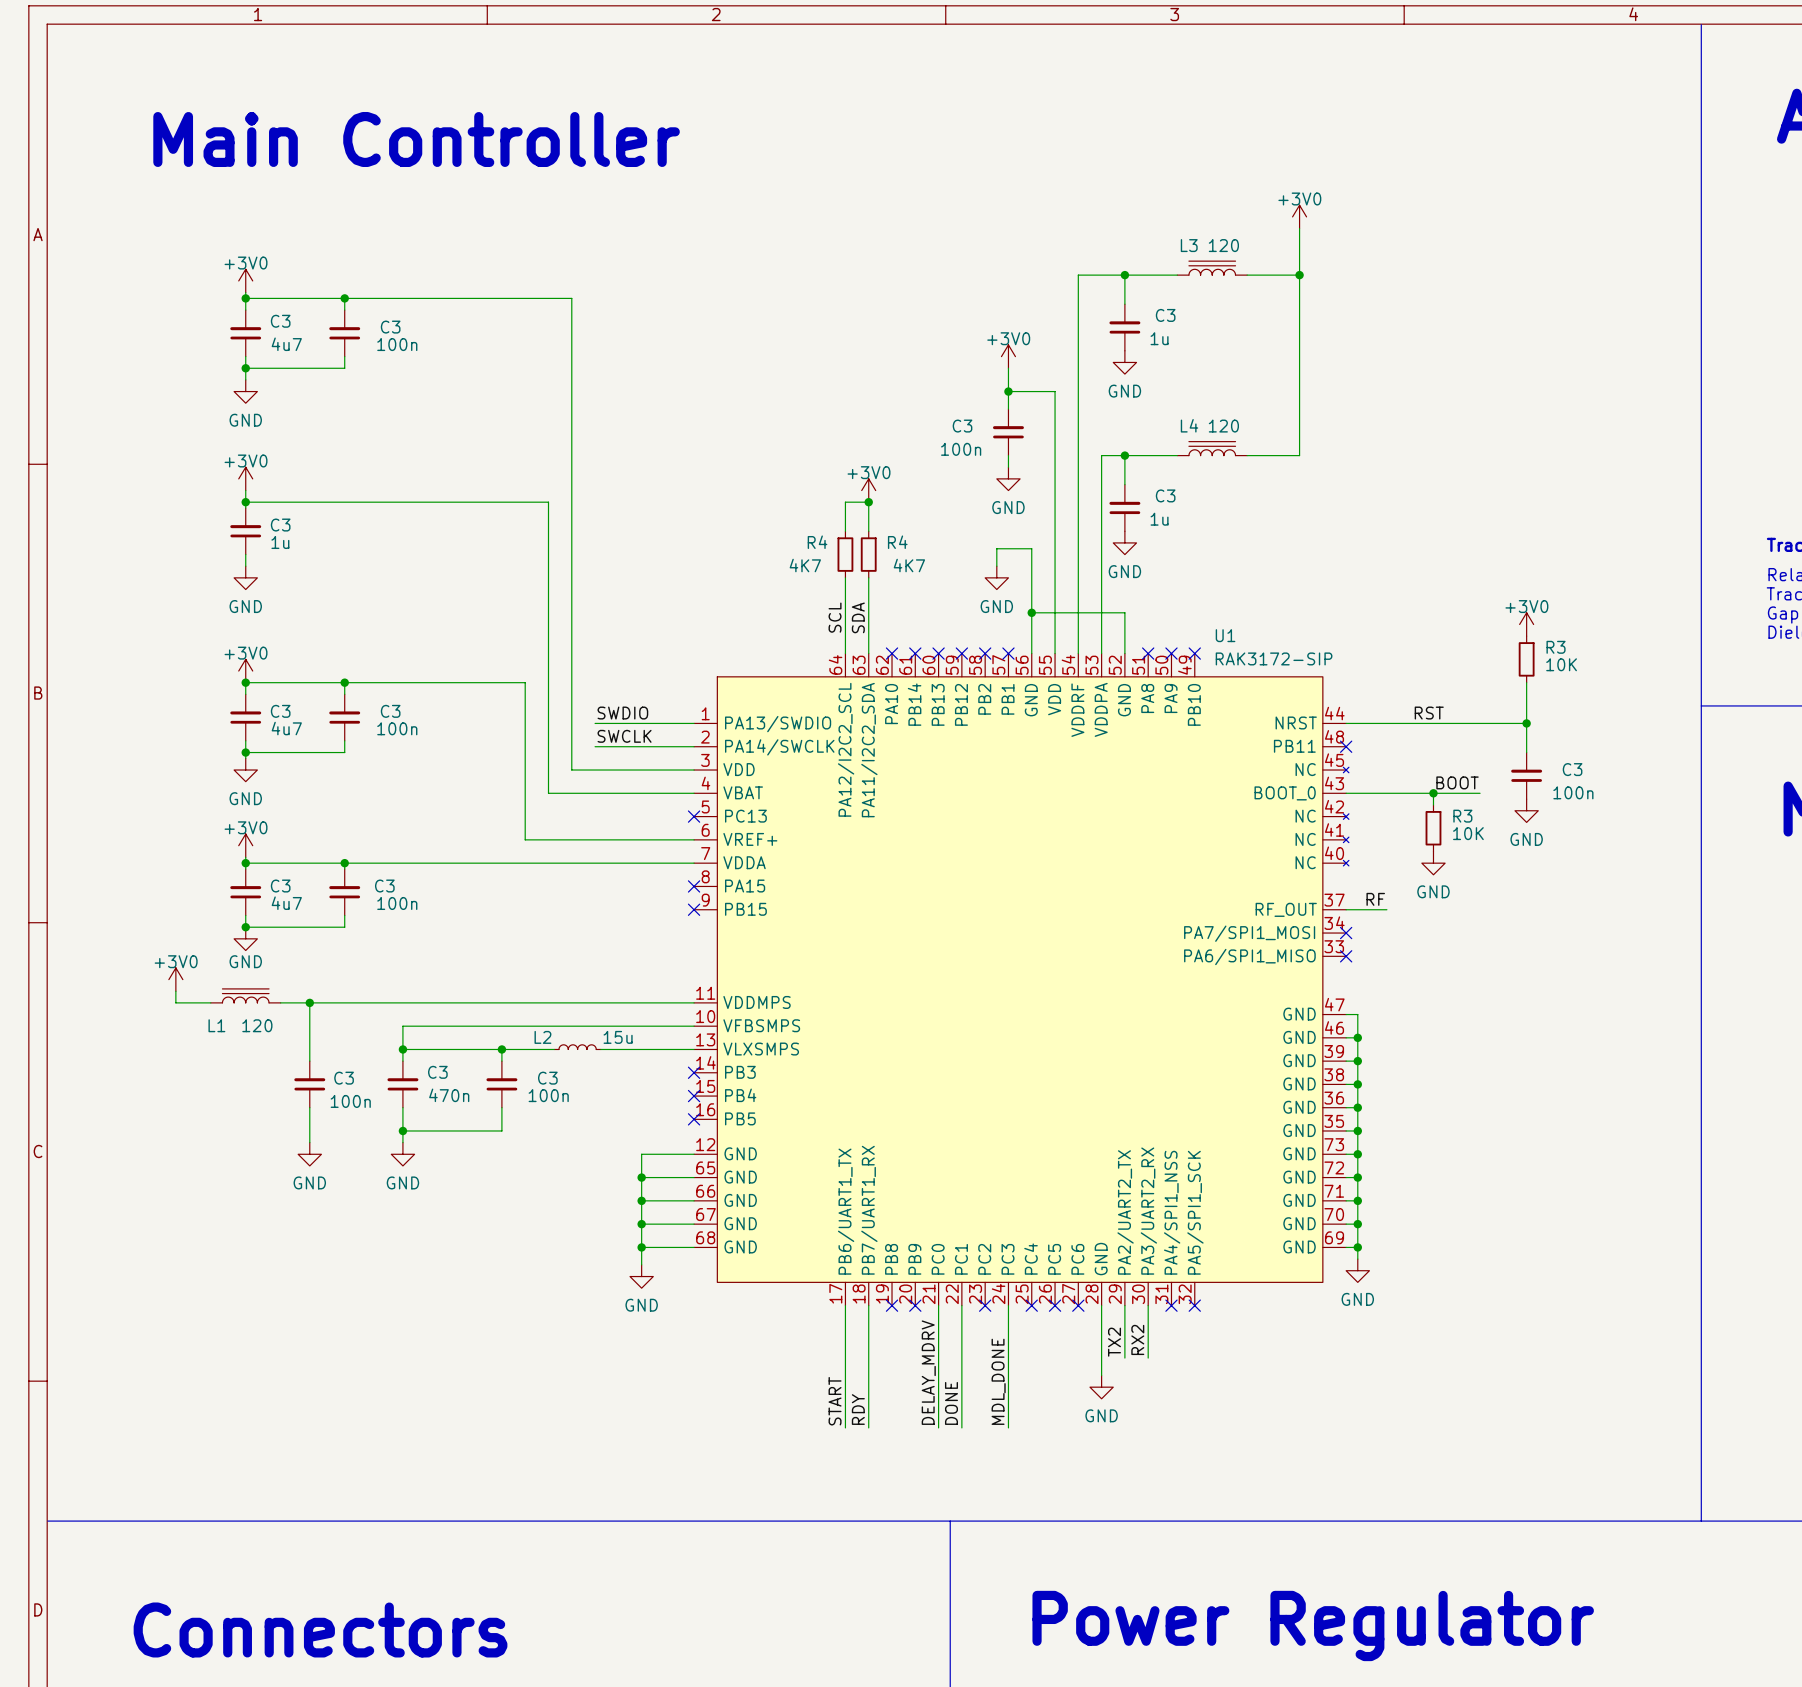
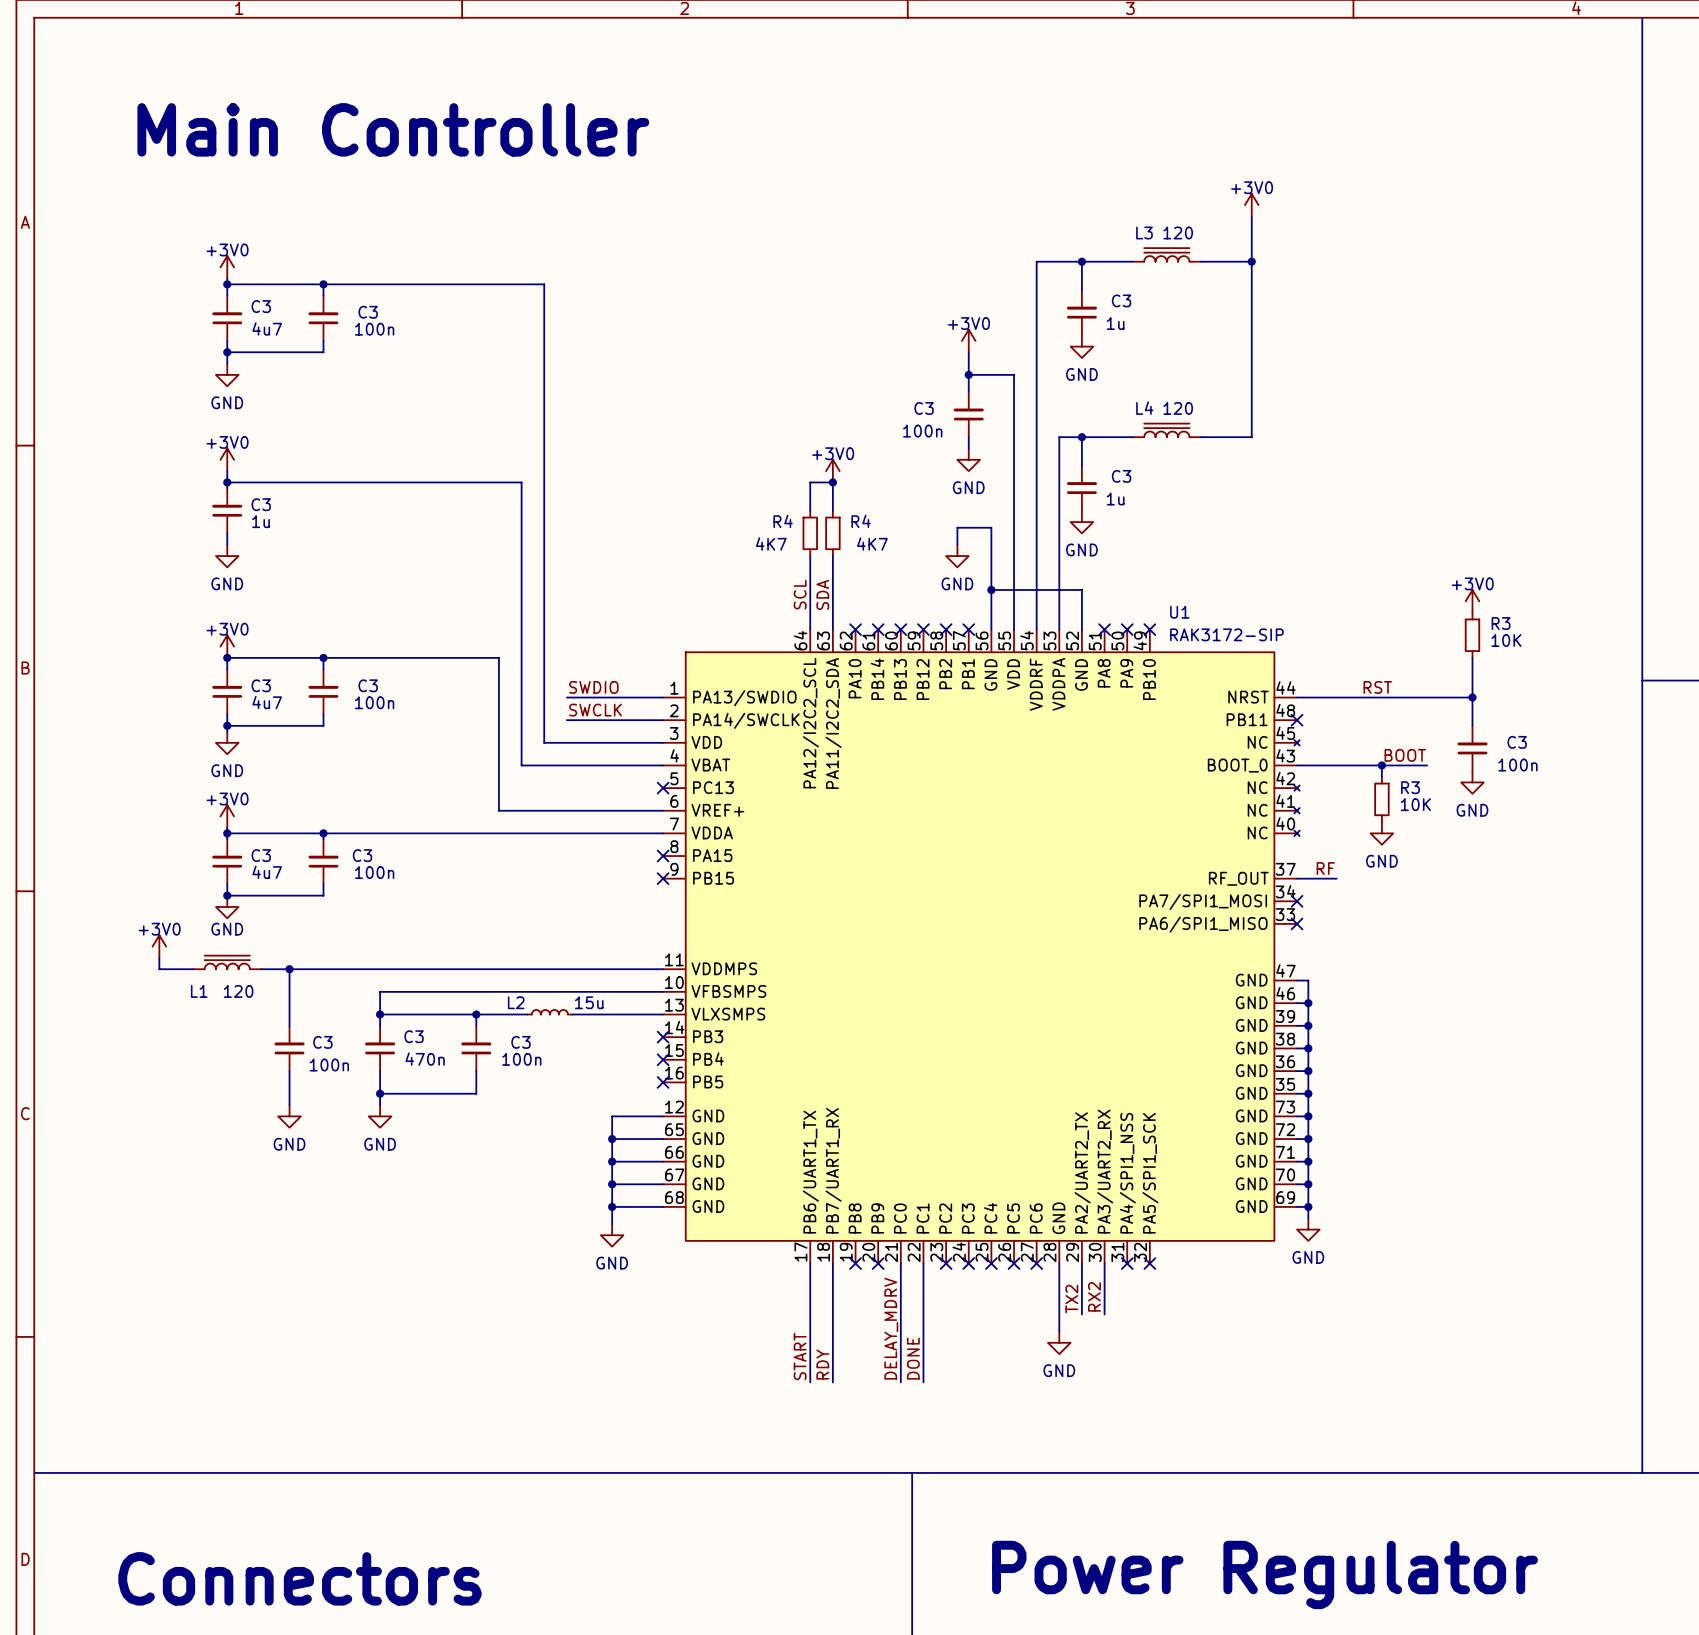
wire: (1008, 1305) (1008, 1427) -> none
no-connect mark: none -> (968, 1263)
label: MDL_DONE (998, 1381) -> none

